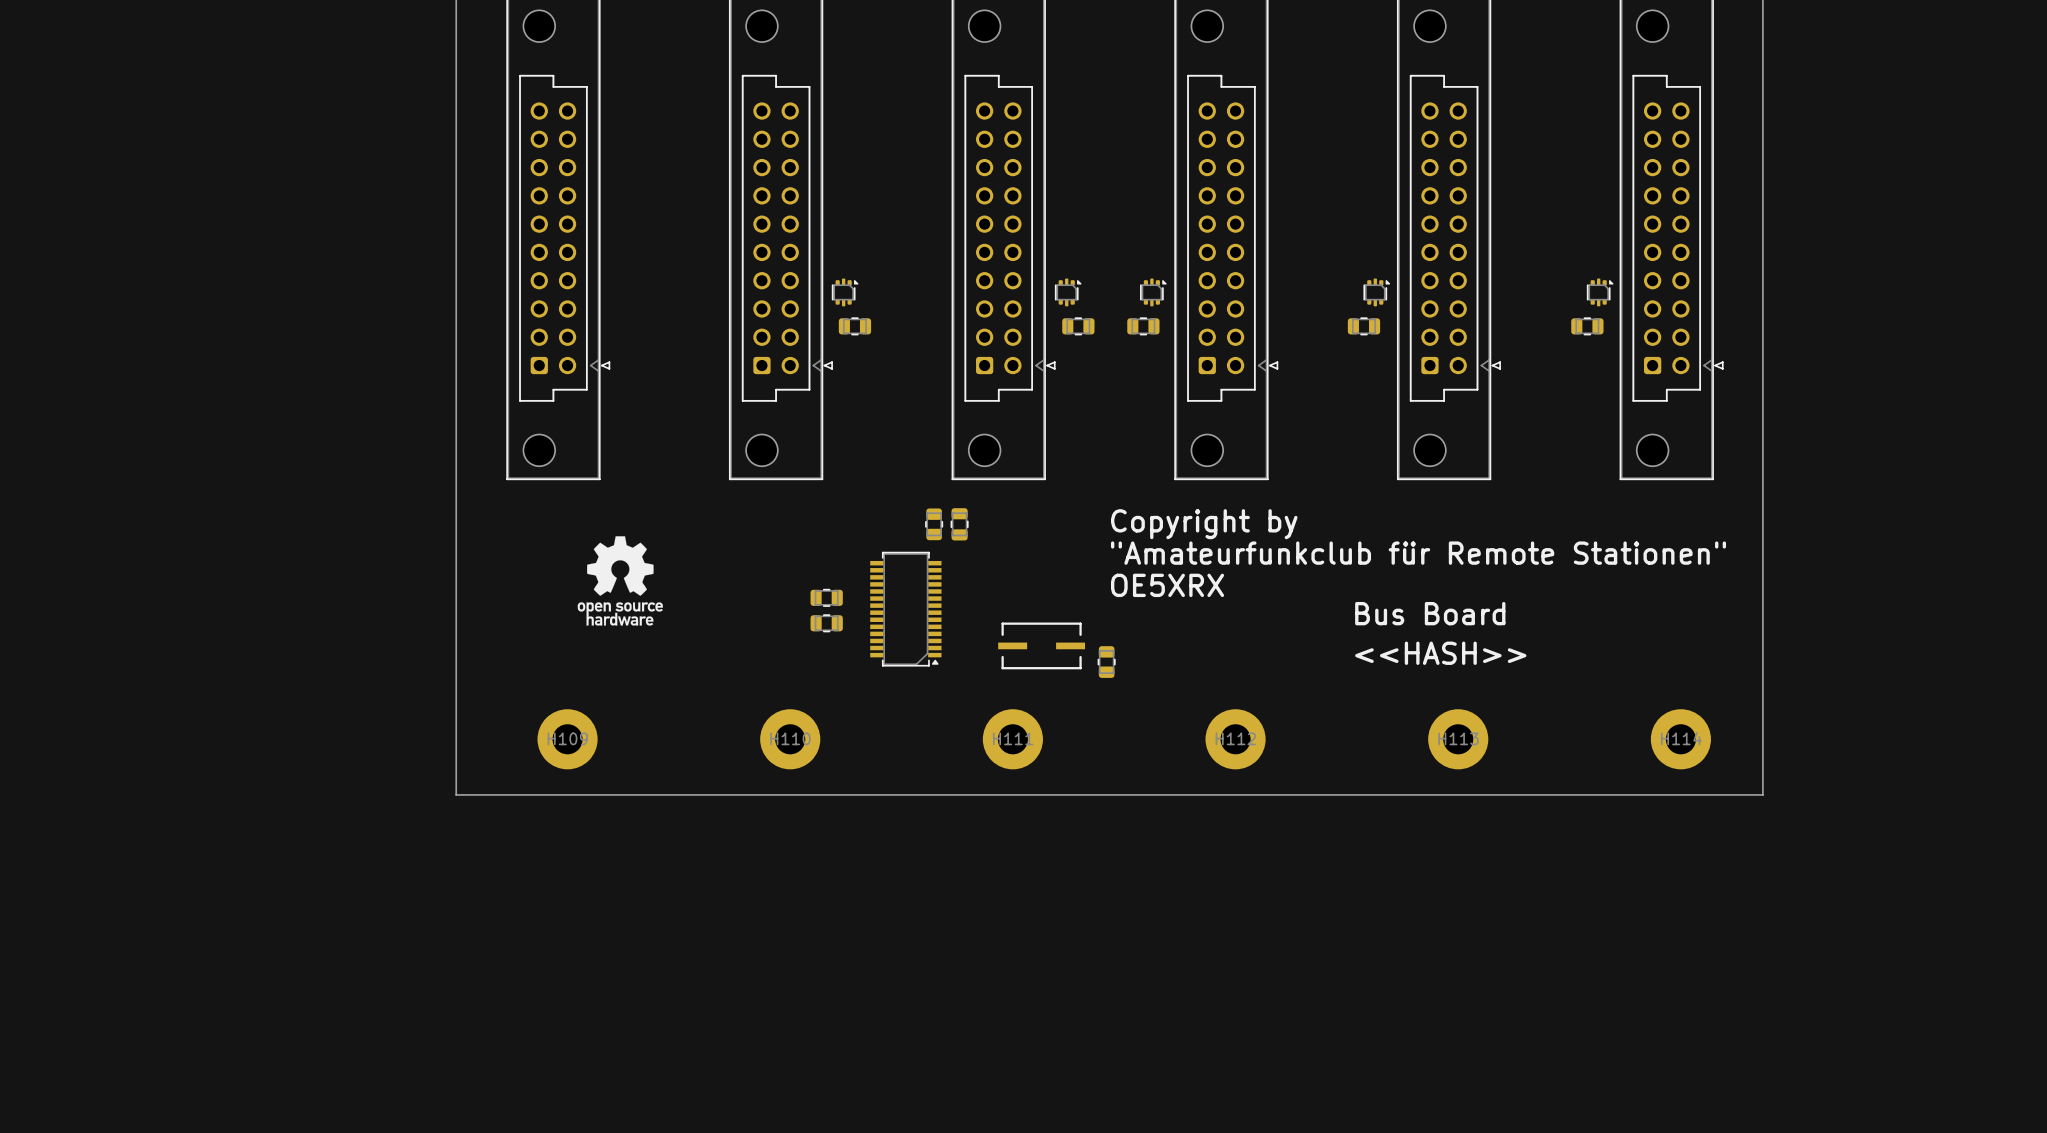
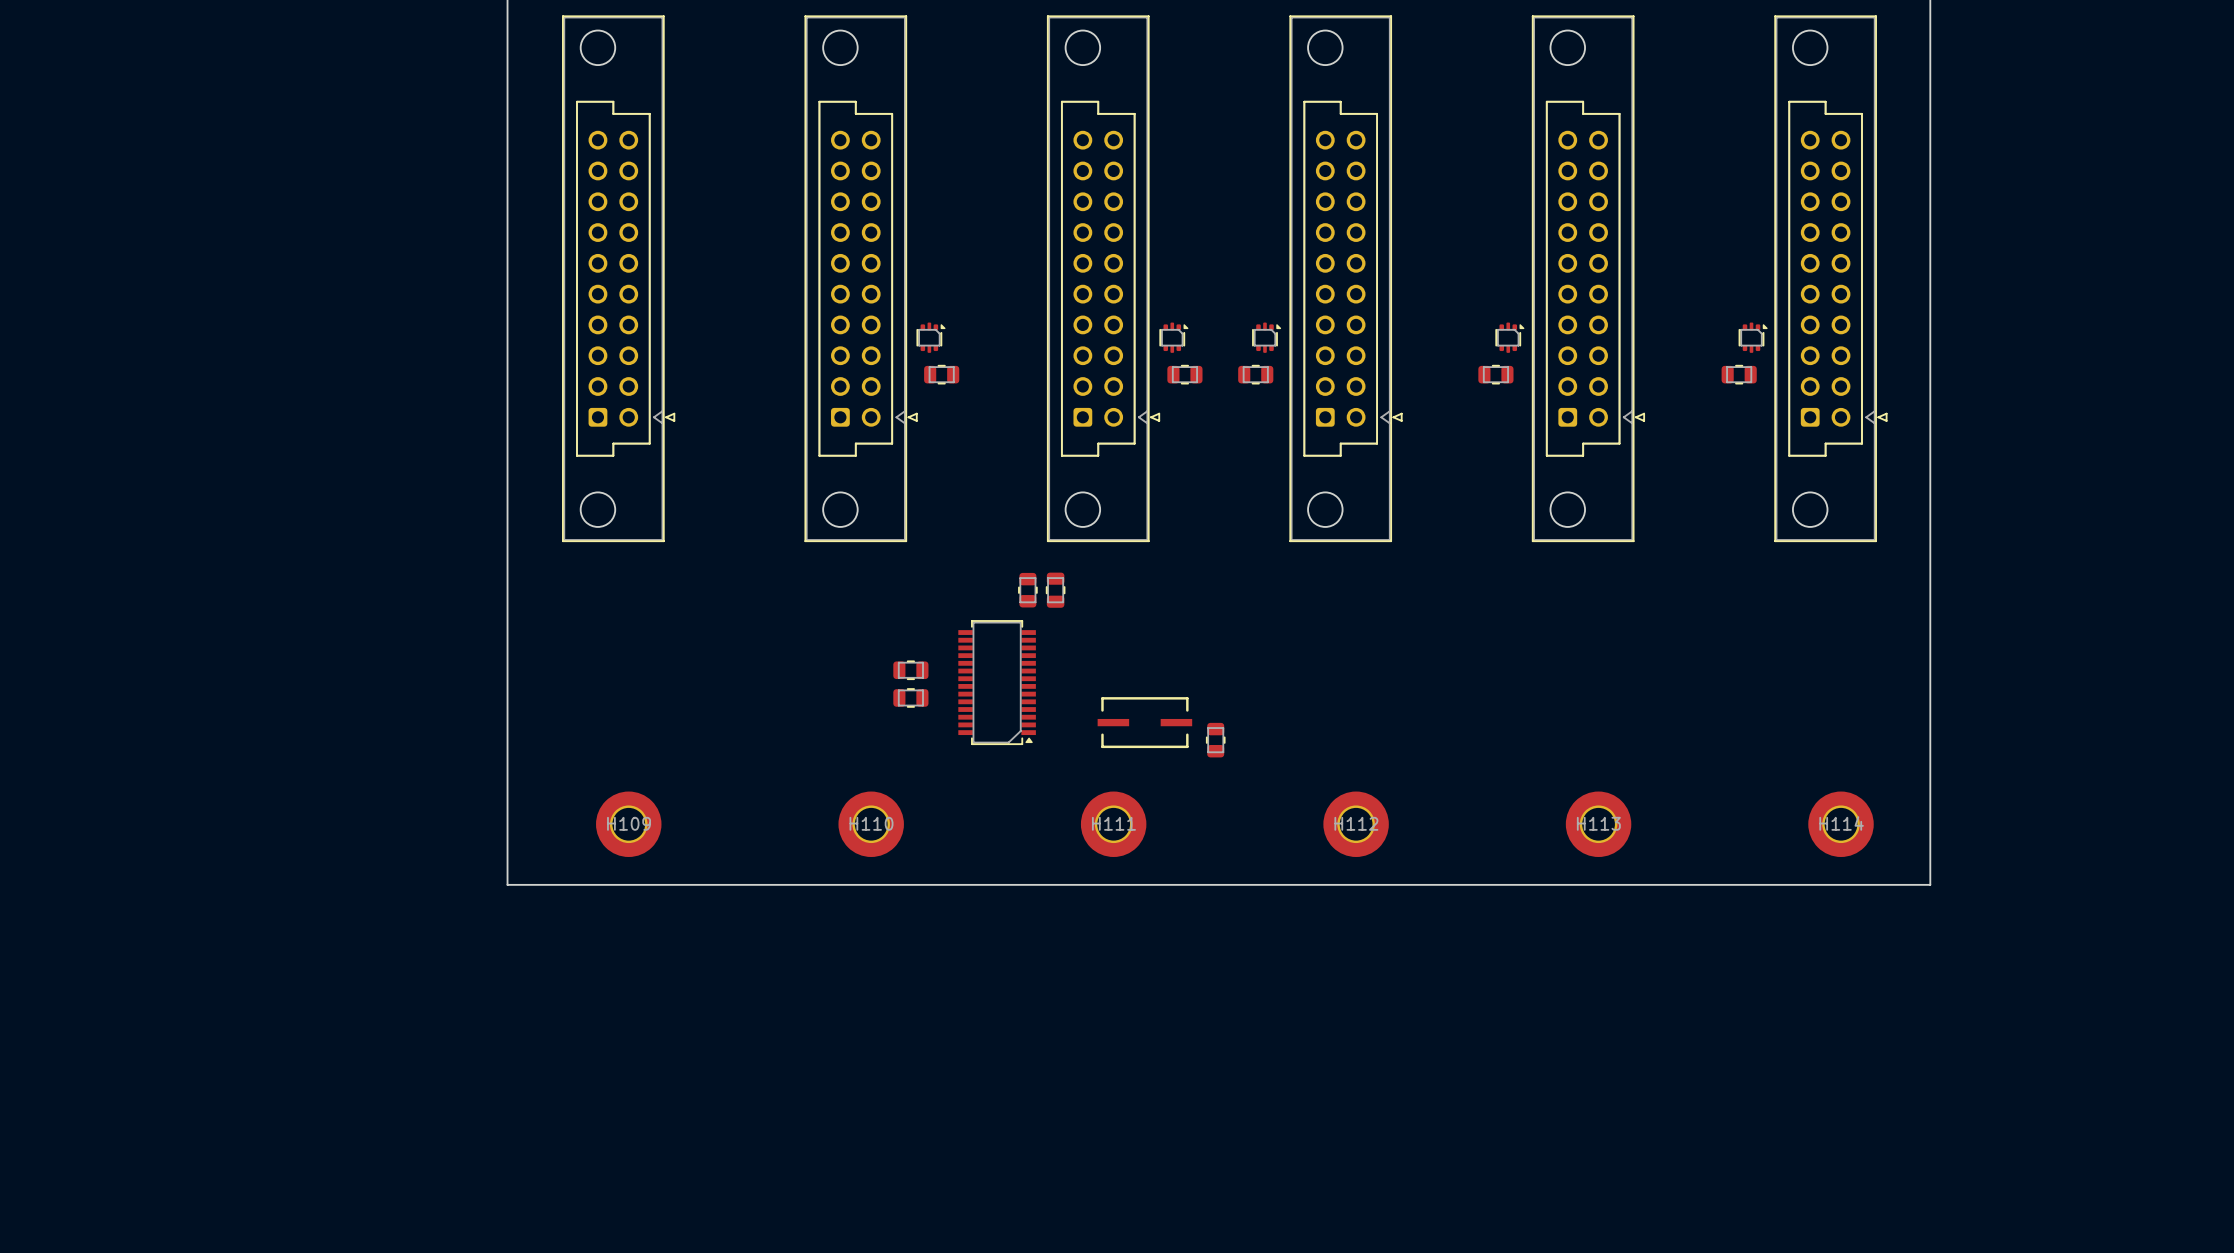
text: Copyright by (1204, 524) -> none
drawing: [577, 536, 663, 626] -> none
text: "Amateurfunkclub für Remote Stationen" (1418, 553) -> none
text: OE5XRX (1167, 585) -> none
text: Bus Board (1430, 613) -> none
text: <<HASH>> (1440, 653) -> none

